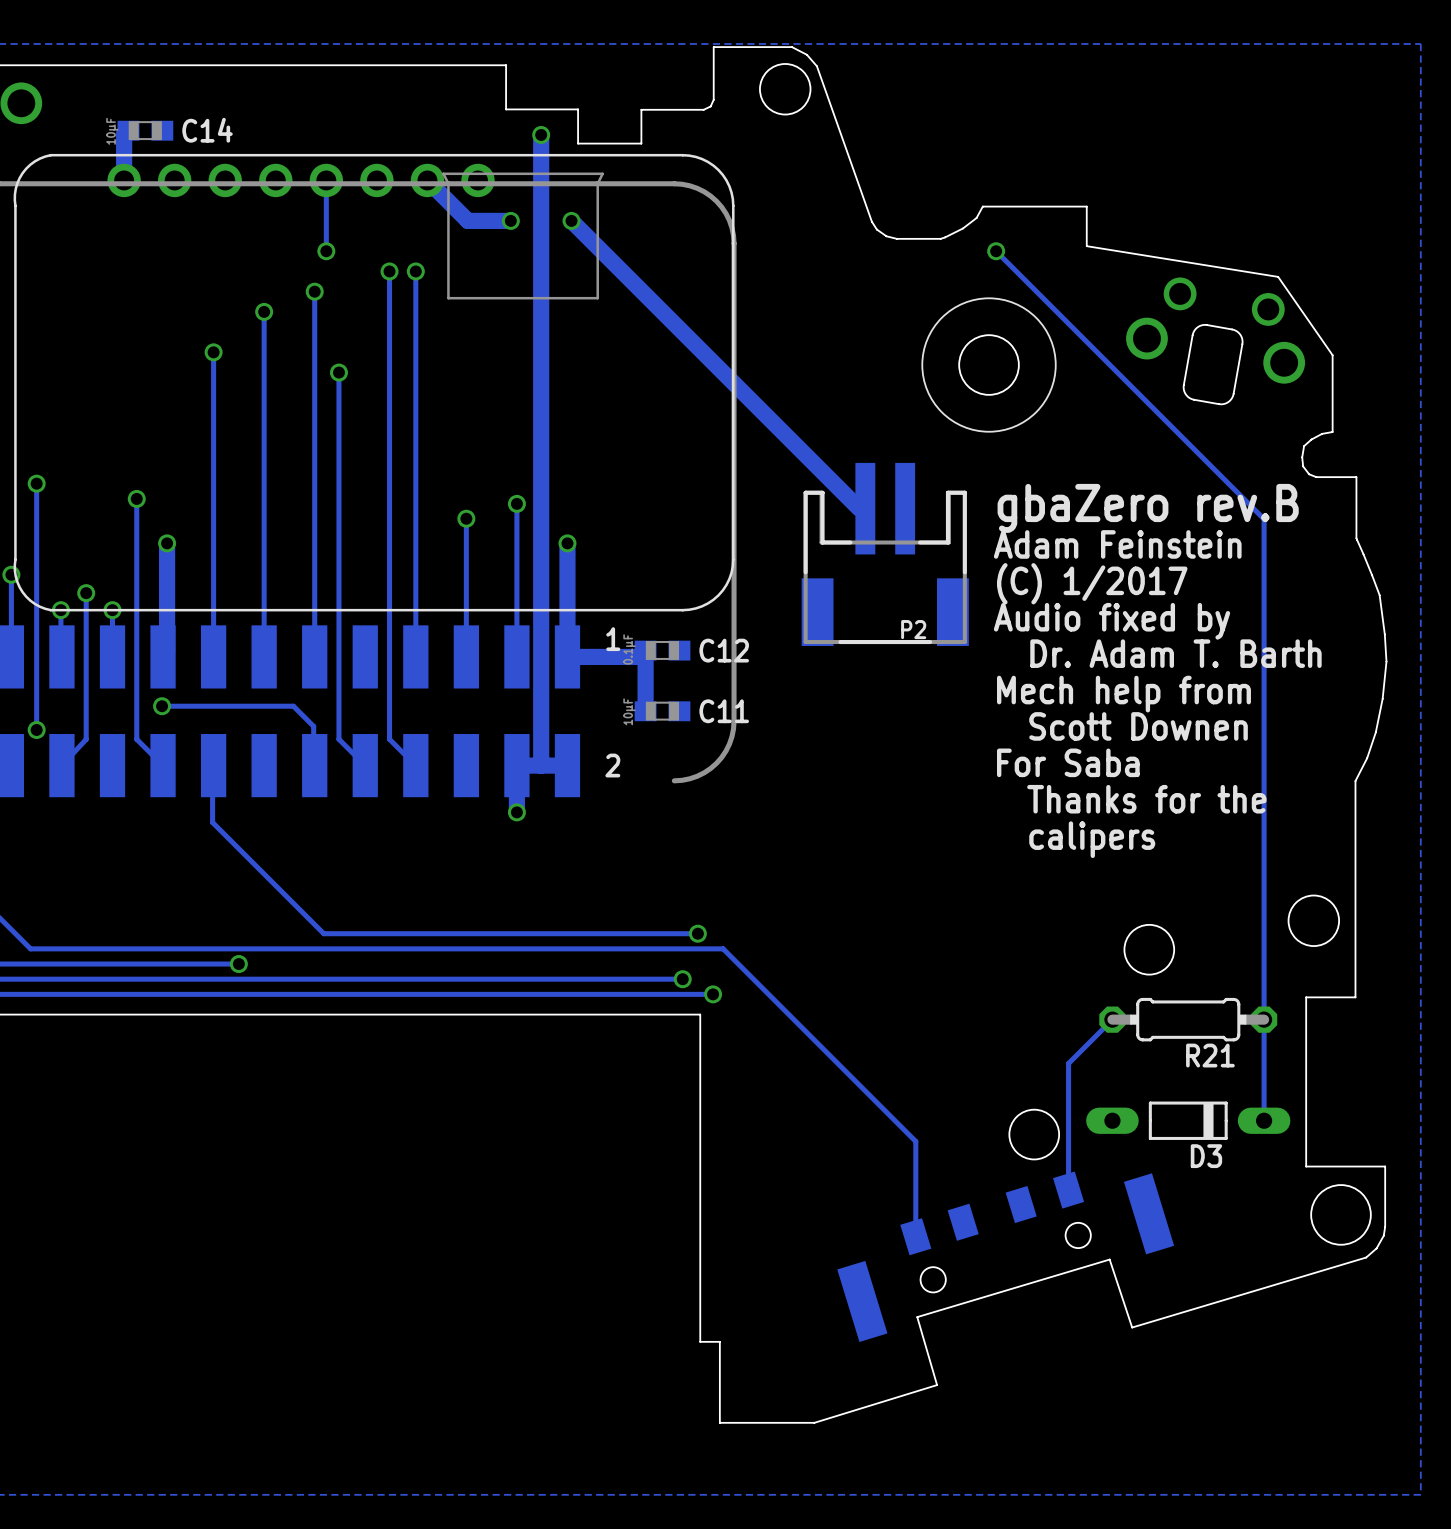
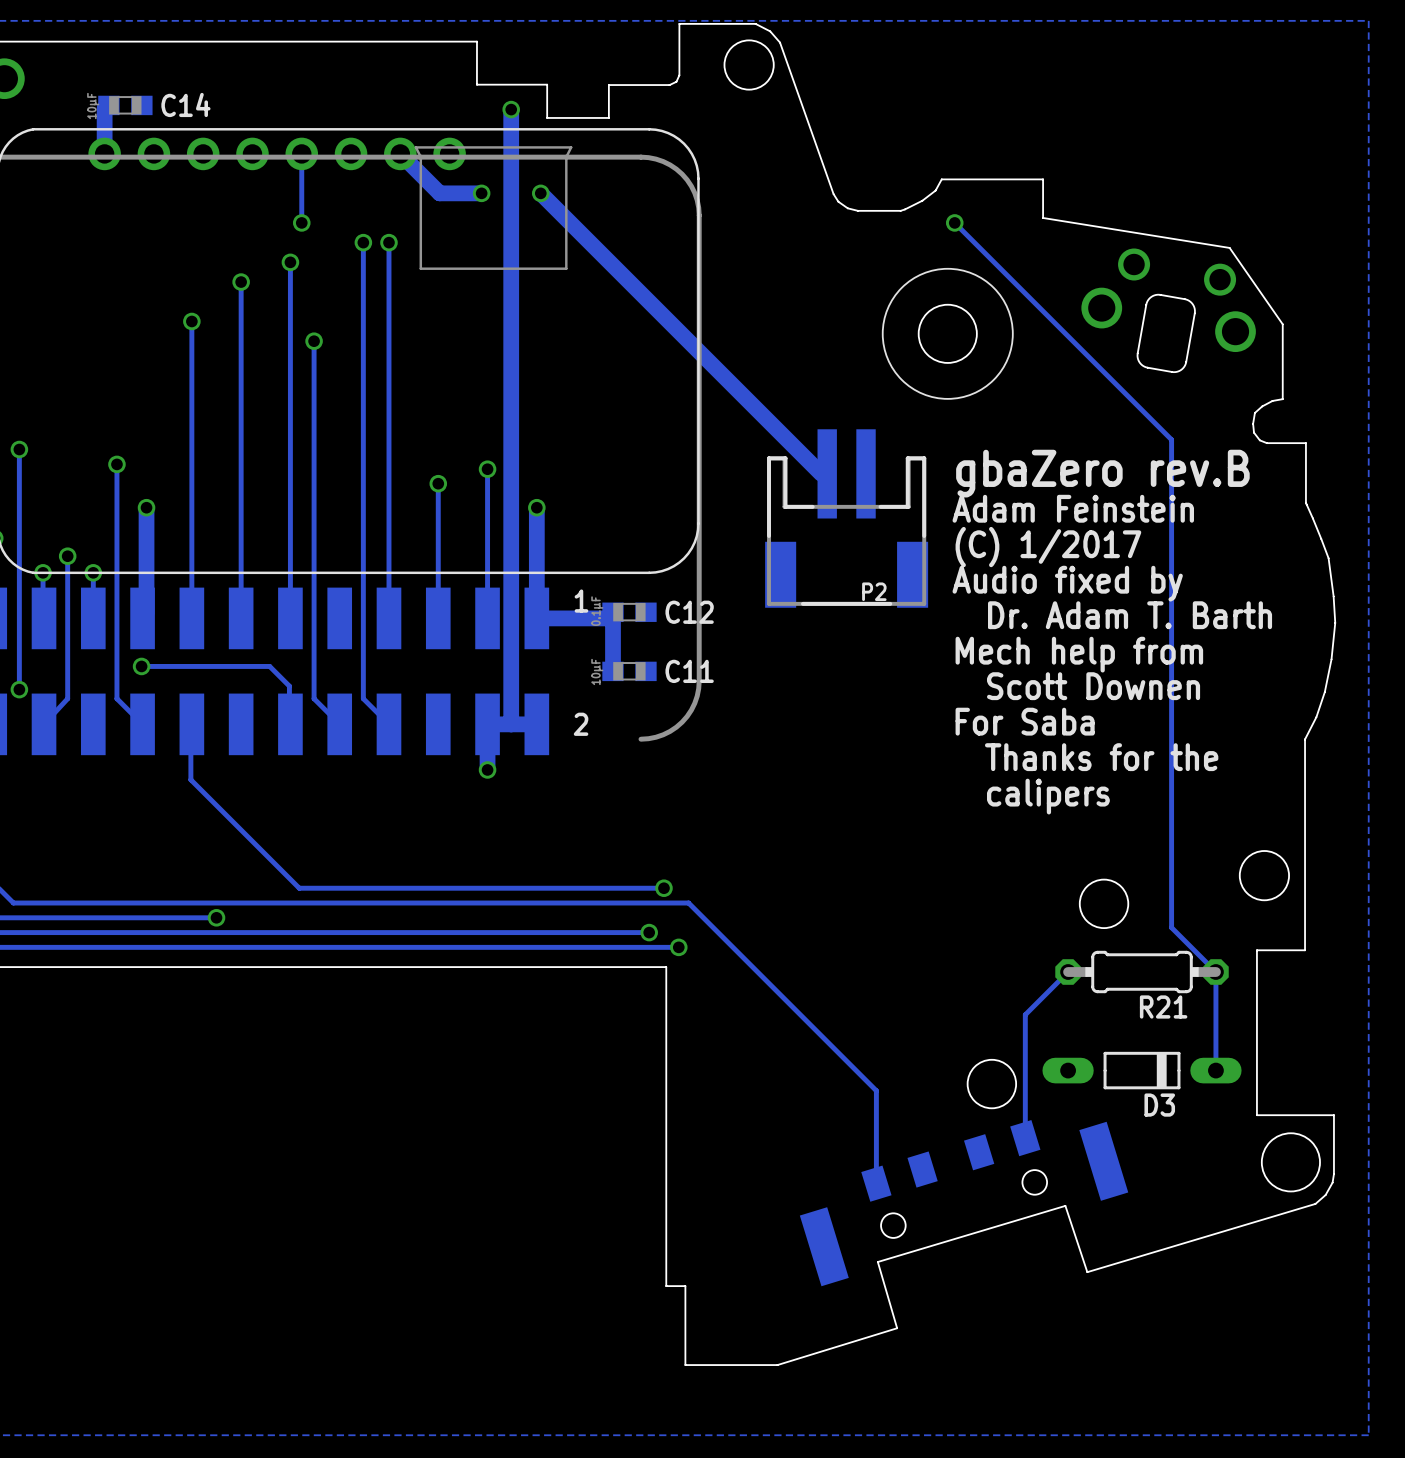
track: (1218, 473) (1264, 519) (1264, 1019) -> (1171, 439) (1171, 927) (1215, 972)

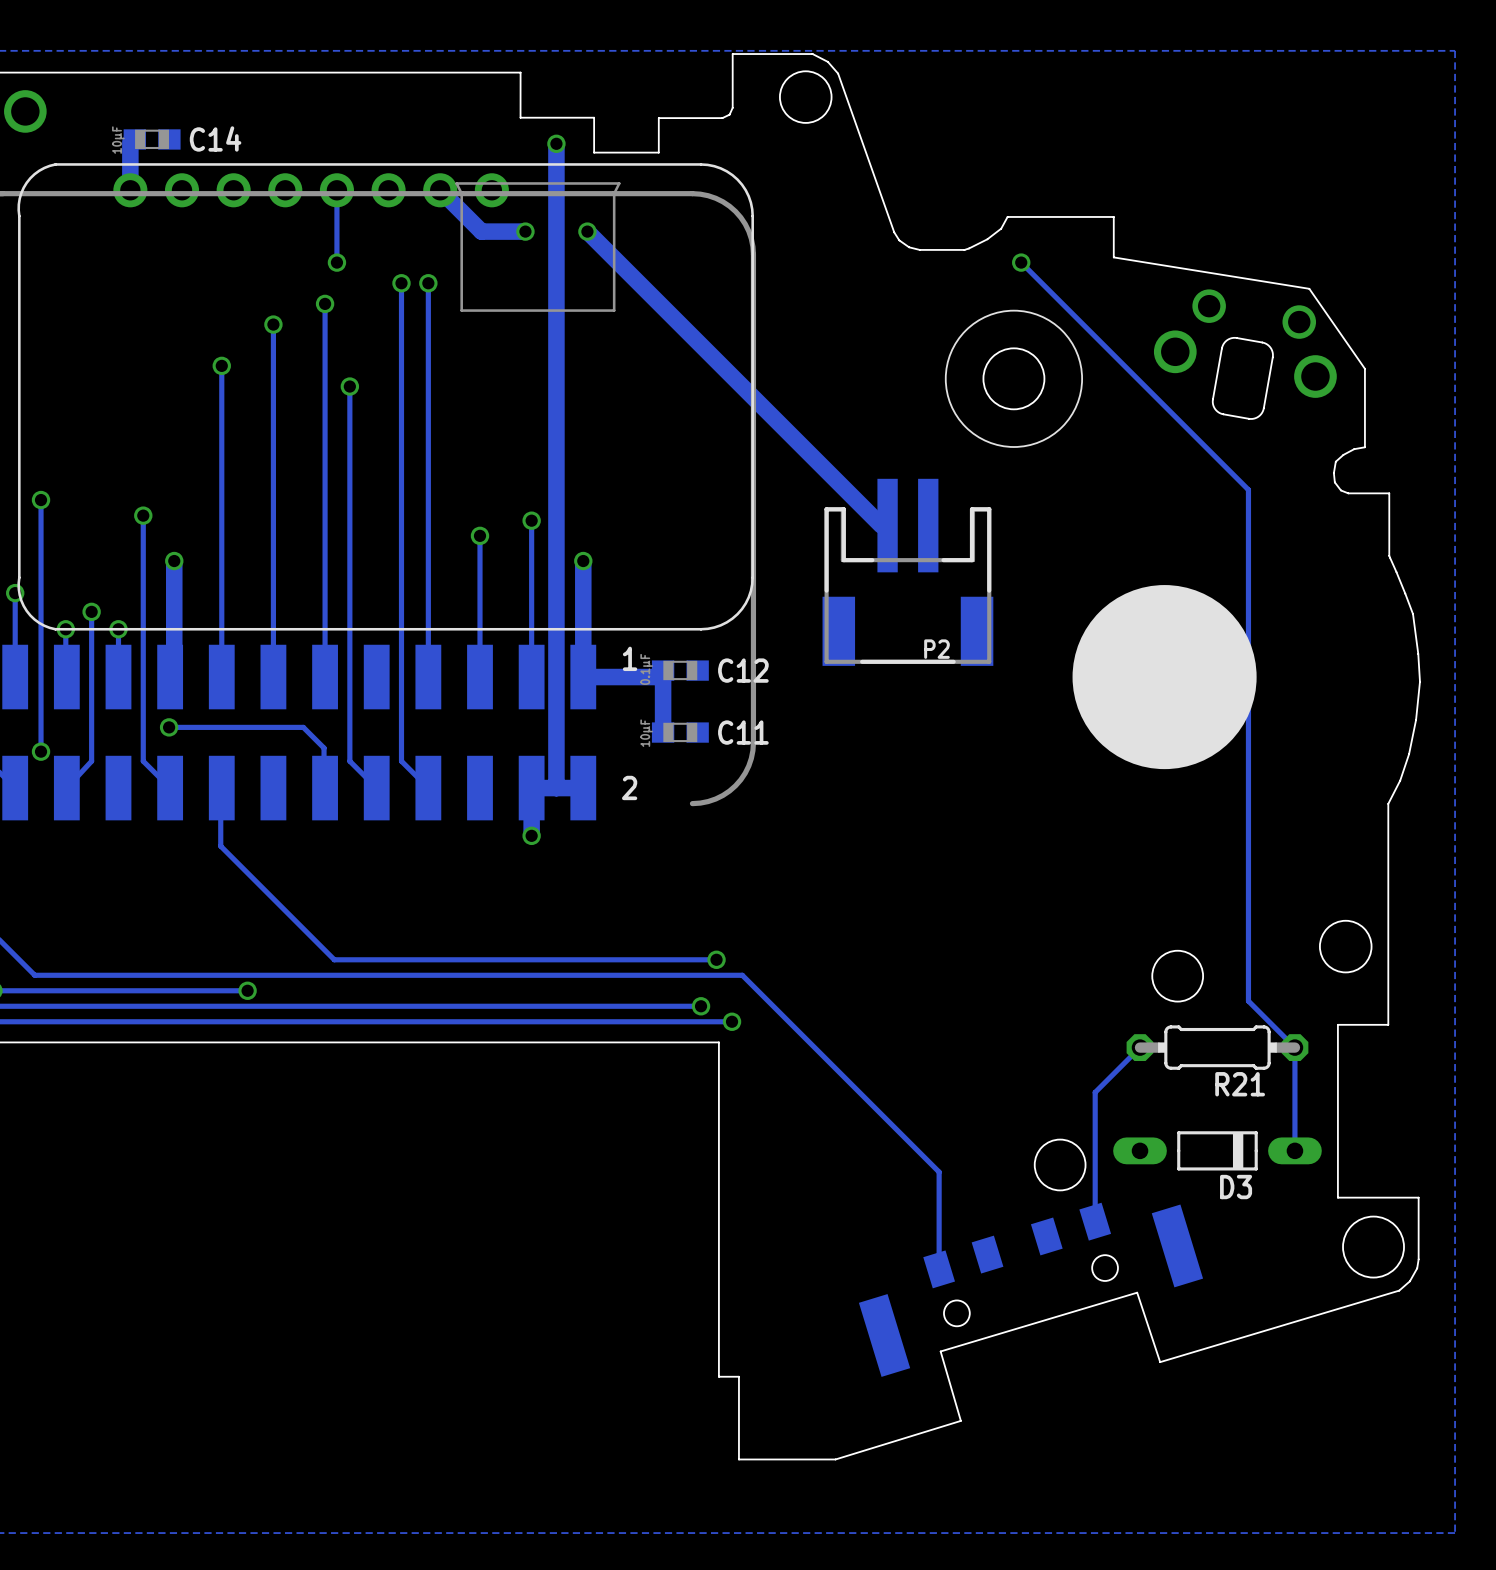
text: gbaZero rev.B (1102, 473) -> none
text: Adam Feinstein (1073, 508) -> none
text: (C) 1/2017 (1048, 547) -> none
text: Audio fixed by (1067, 583) -> none
text: Dr. Adam T. Barth (1130, 615) -> none
part: none -> (1164, 677)
text: Mech help from (1079, 654) -> none
text: Scott Downen (1093, 686) -> none
text: For Saba (1025, 721) -> none
text: Thanks for the (1101, 757) -> none
text: calipers (1048, 796) -> none

